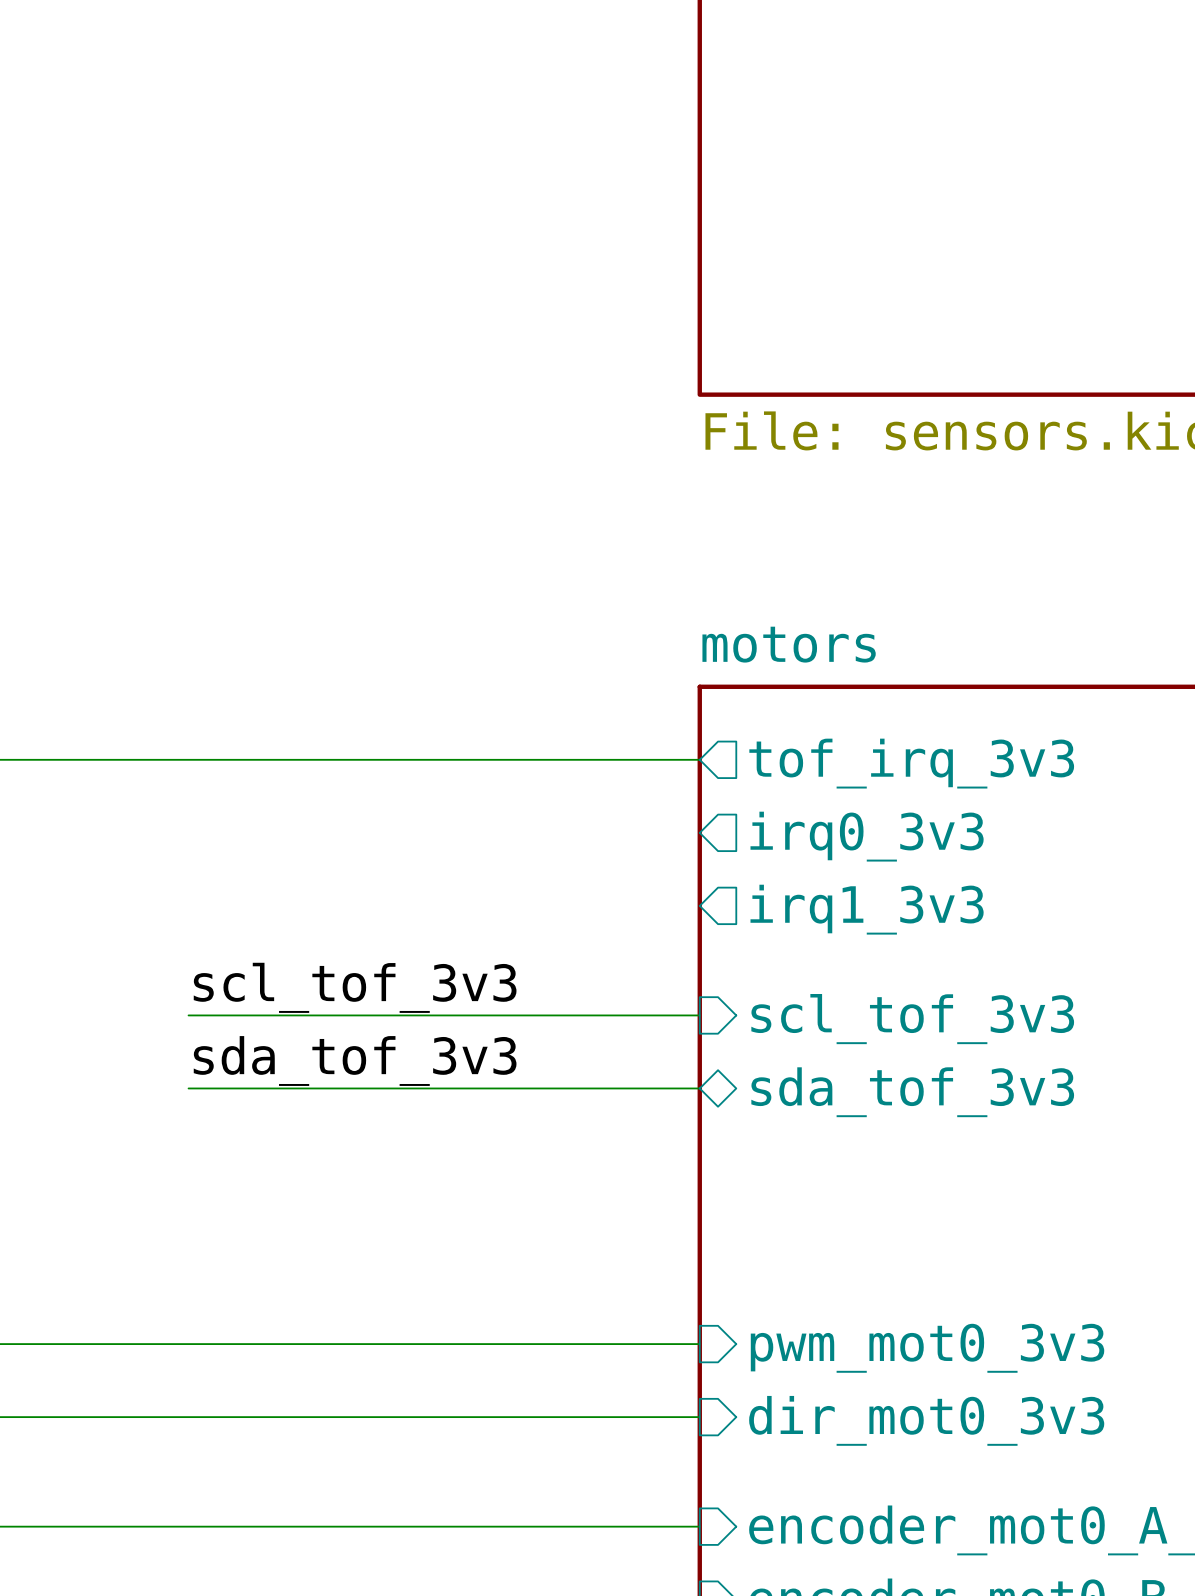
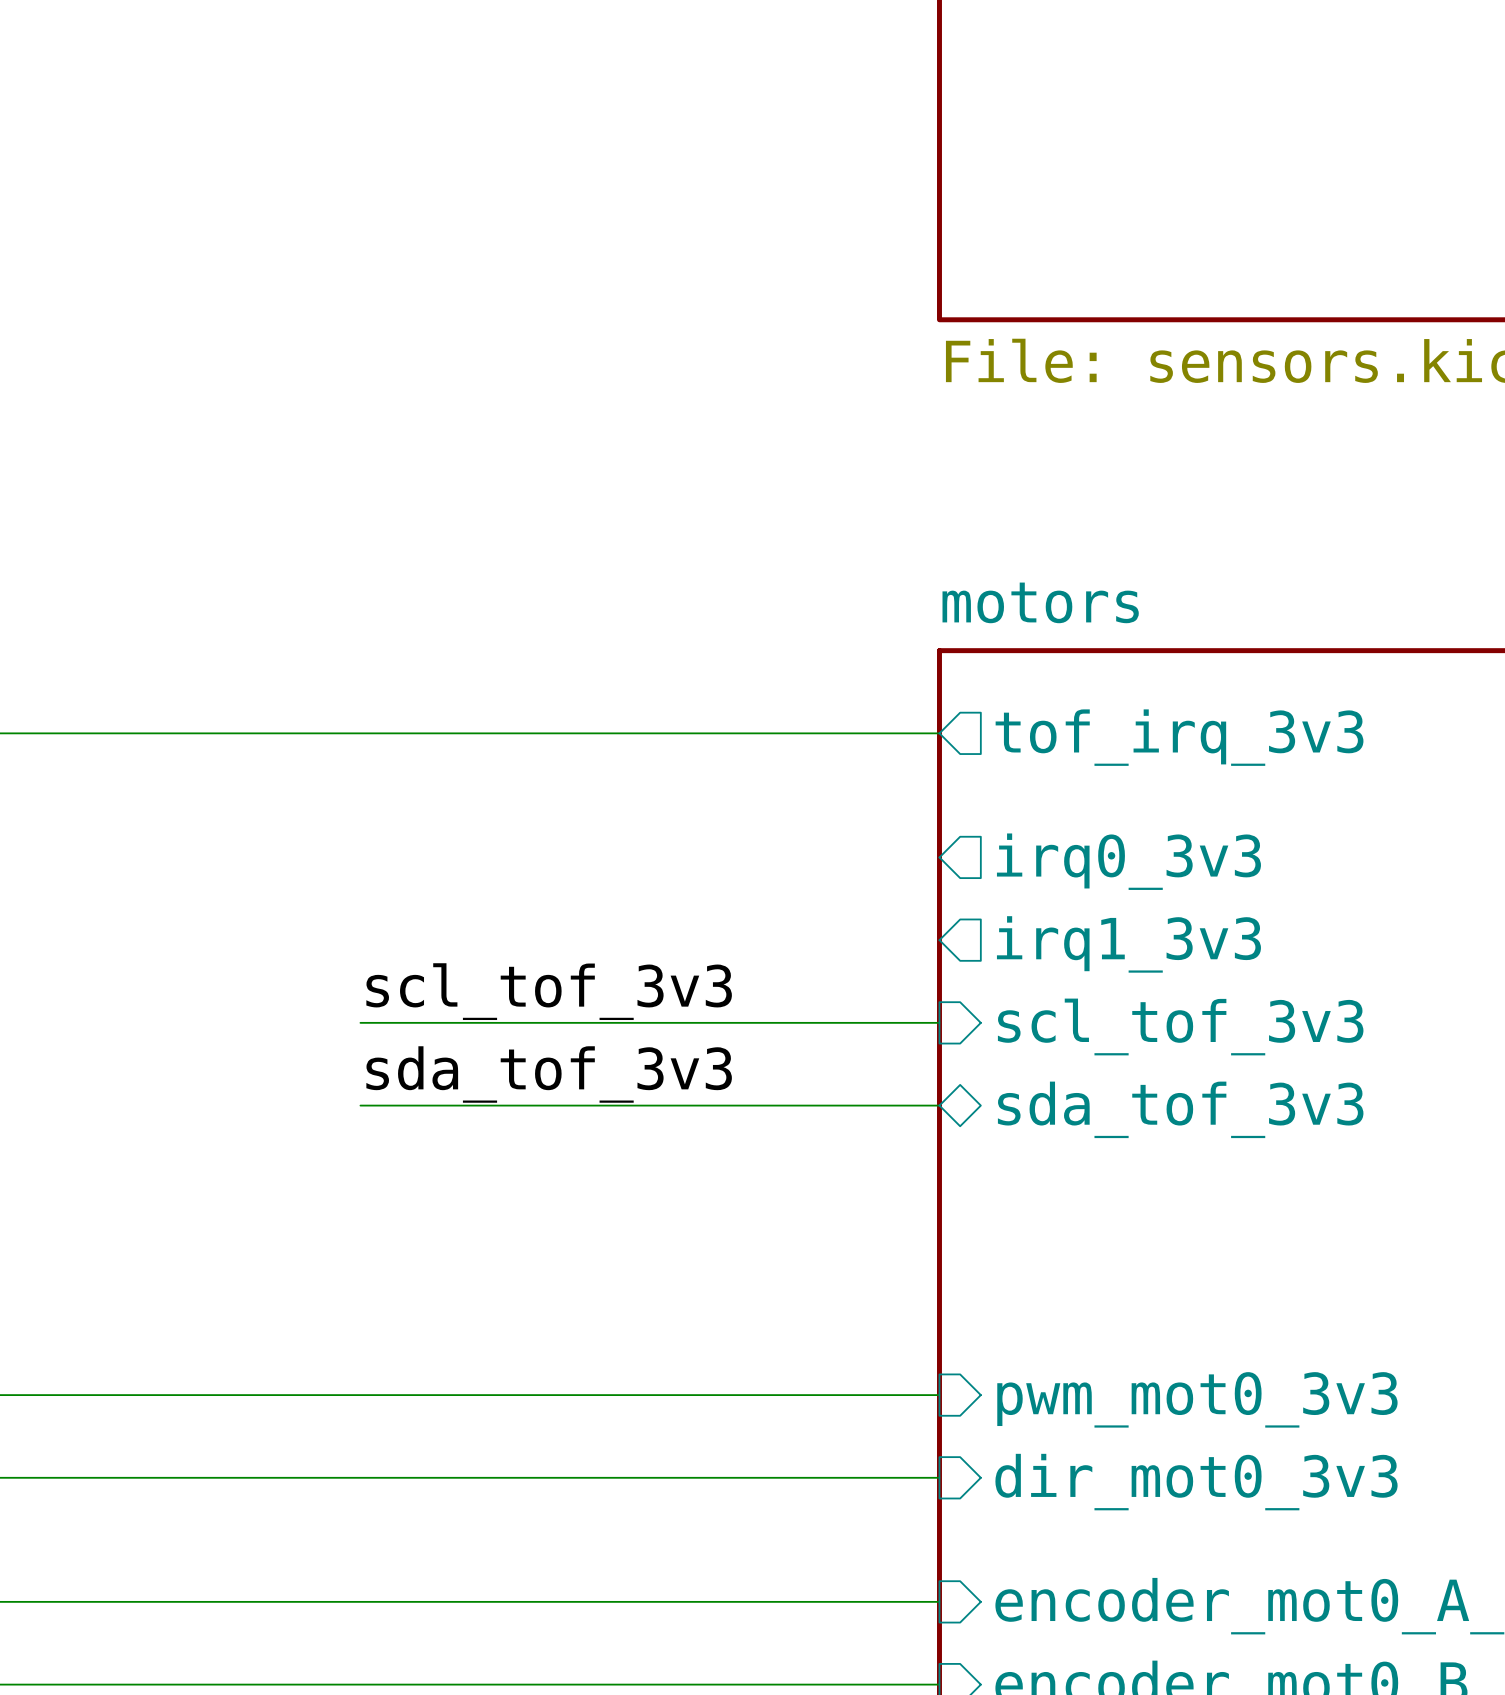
sheet pin position: irq0_3v3 (867, 836) -> irq0_3v3 (1128, 861)
sheet pin position: irq1_3v3 (867, 909) -> irq1_3v3 (1128, 944)

